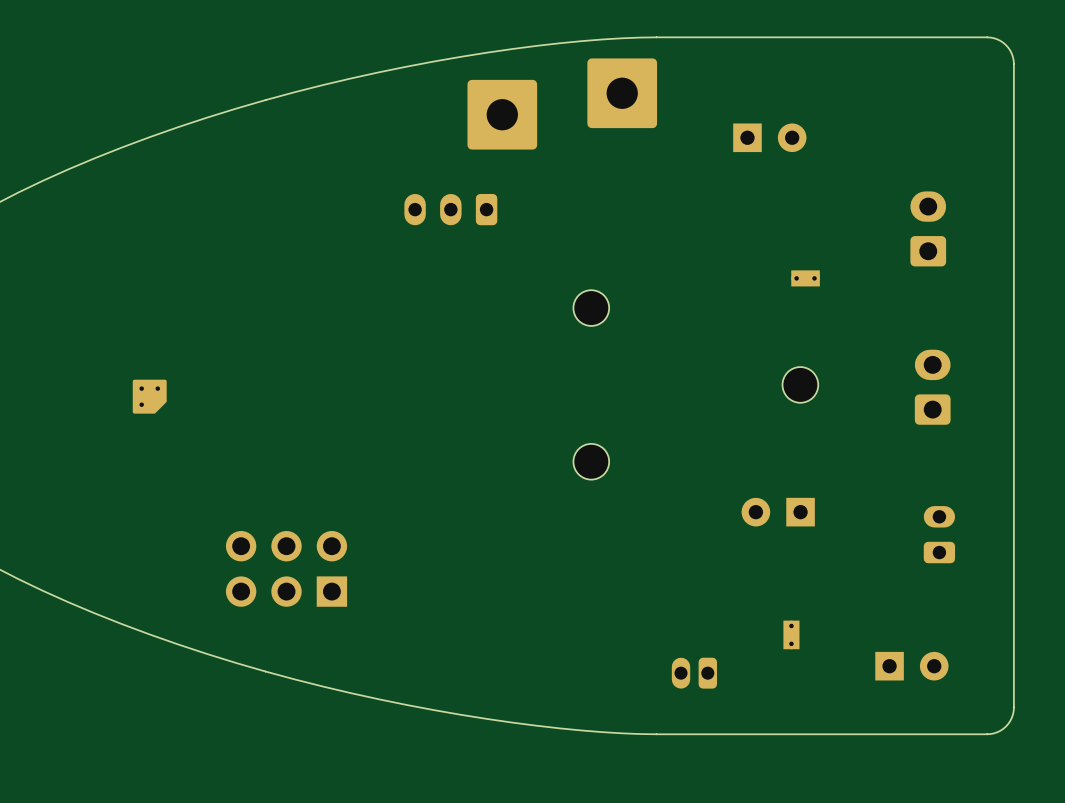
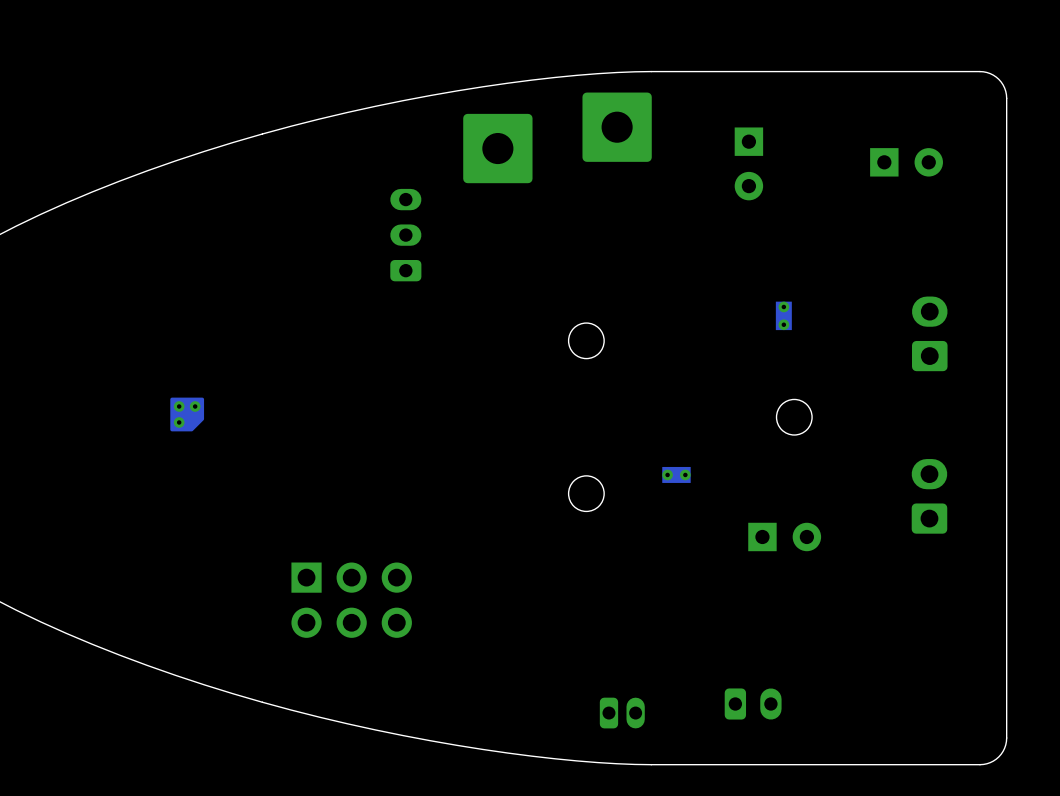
part: none -> (906, 162)
part rotation: 0° (769, 137) -> 90° clockwise (748, 163)
part rotation: 0° (450, 209) -> 90° clockwise (405, 235)
part: (928, 228) -> none
part rotation: 0° (805, 278) -> 90° clockwise (783, 315)
part: none -> (929, 333)
part: (932, 387) -> none
part position: (149, 396) -> (187, 414)
part: none -> (929, 496)
part rotation: 0° (778, 512) -> 180° (784, 536)
part rotation: 0° (939, 534) -> 90° clockwise (753, 704)
part position: (939, 534) -> (753, 704)
part rotation: 0° (286, 568) -> 180° (351, 600)
part rotation: 0° (791, 634) -> 90° clockwise (676, 474)
part position: (791, 634) -> (676, 474)
part: (911, 666) -> none
part rotation: 0° (694, 673) -> 180° (622, 713)
part position: (694, 673) -> (622, 713)

